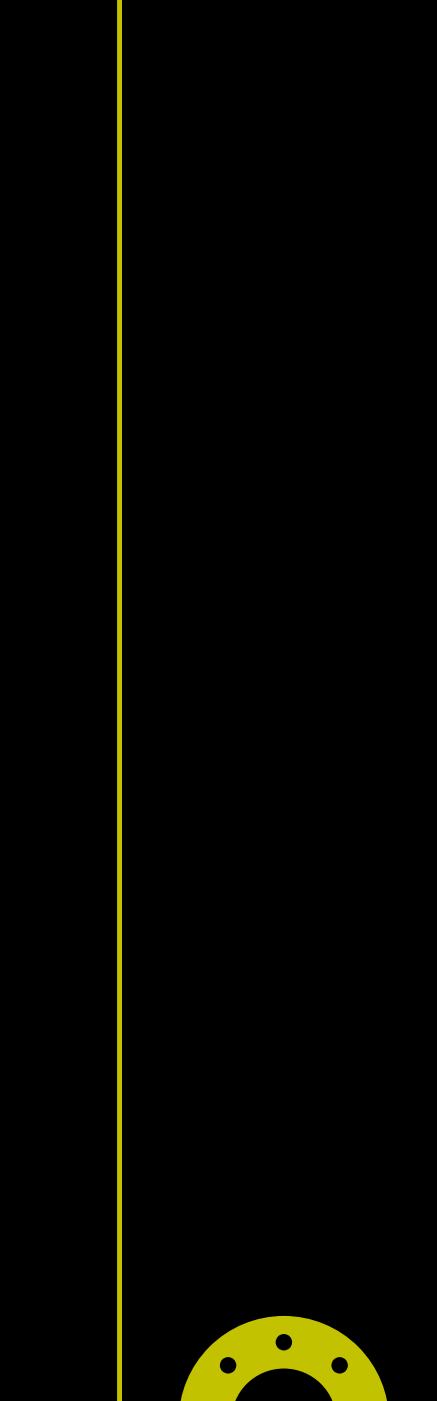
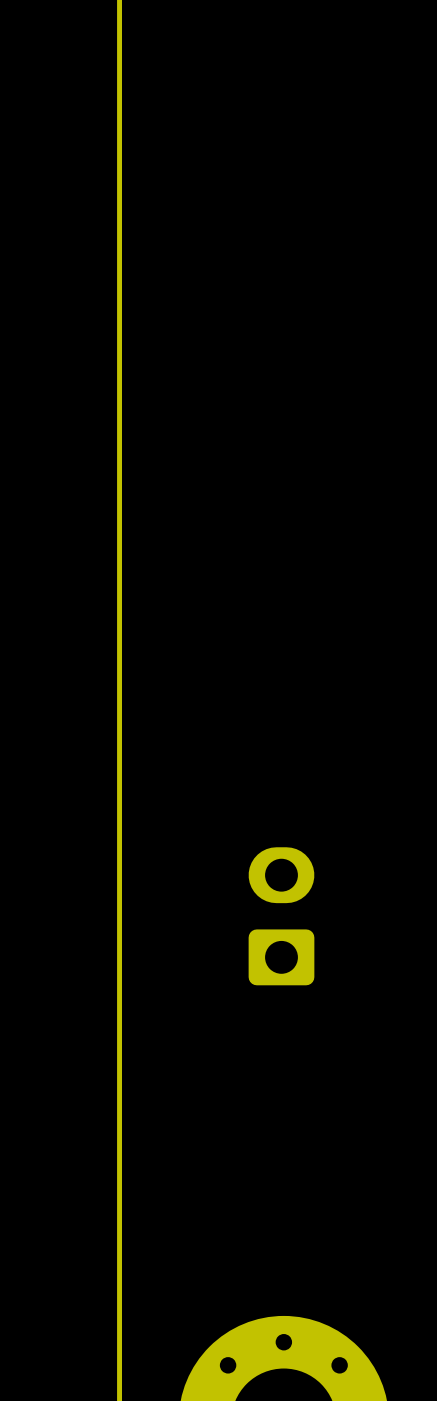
part: none -> (281, 916)

